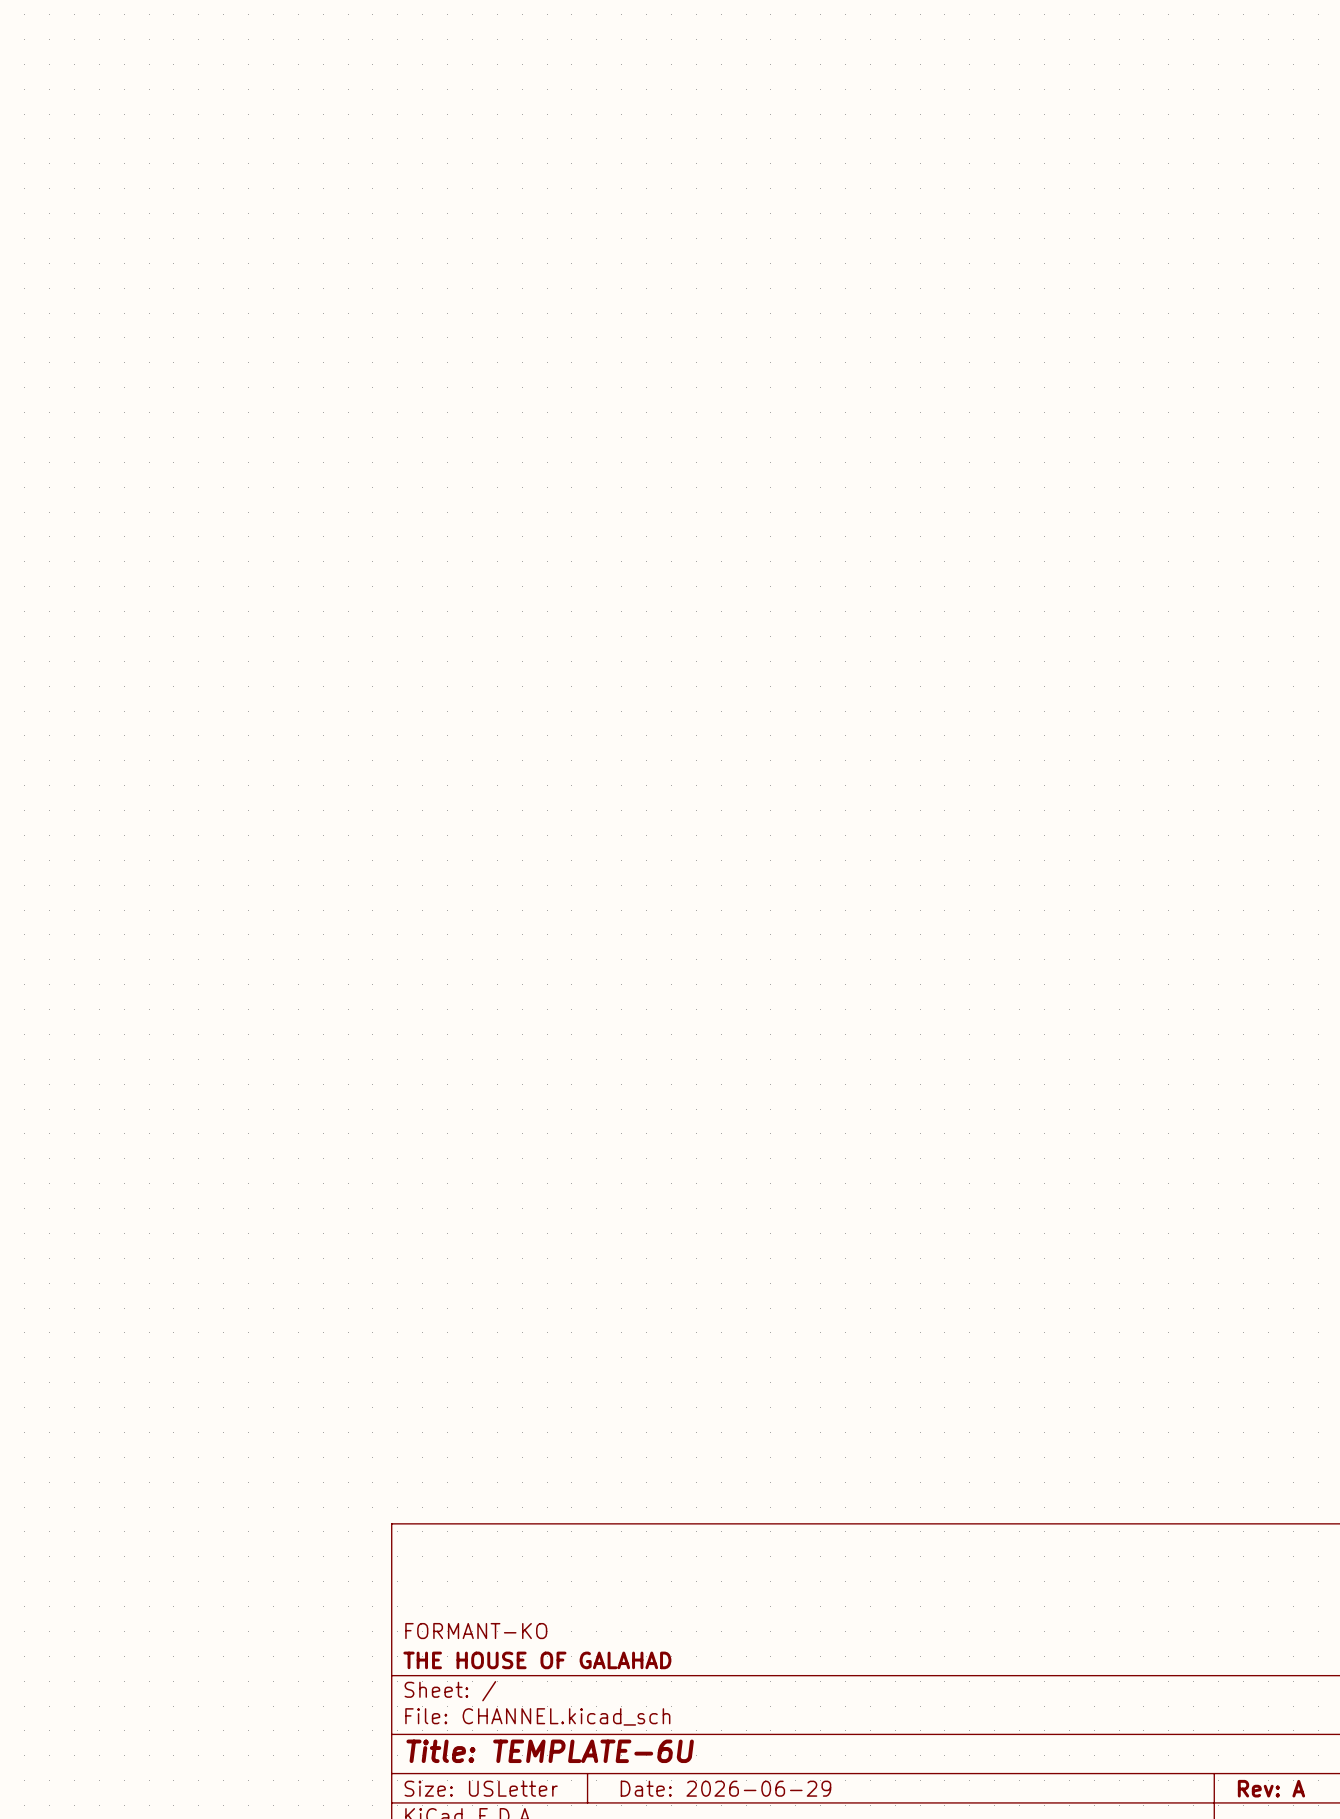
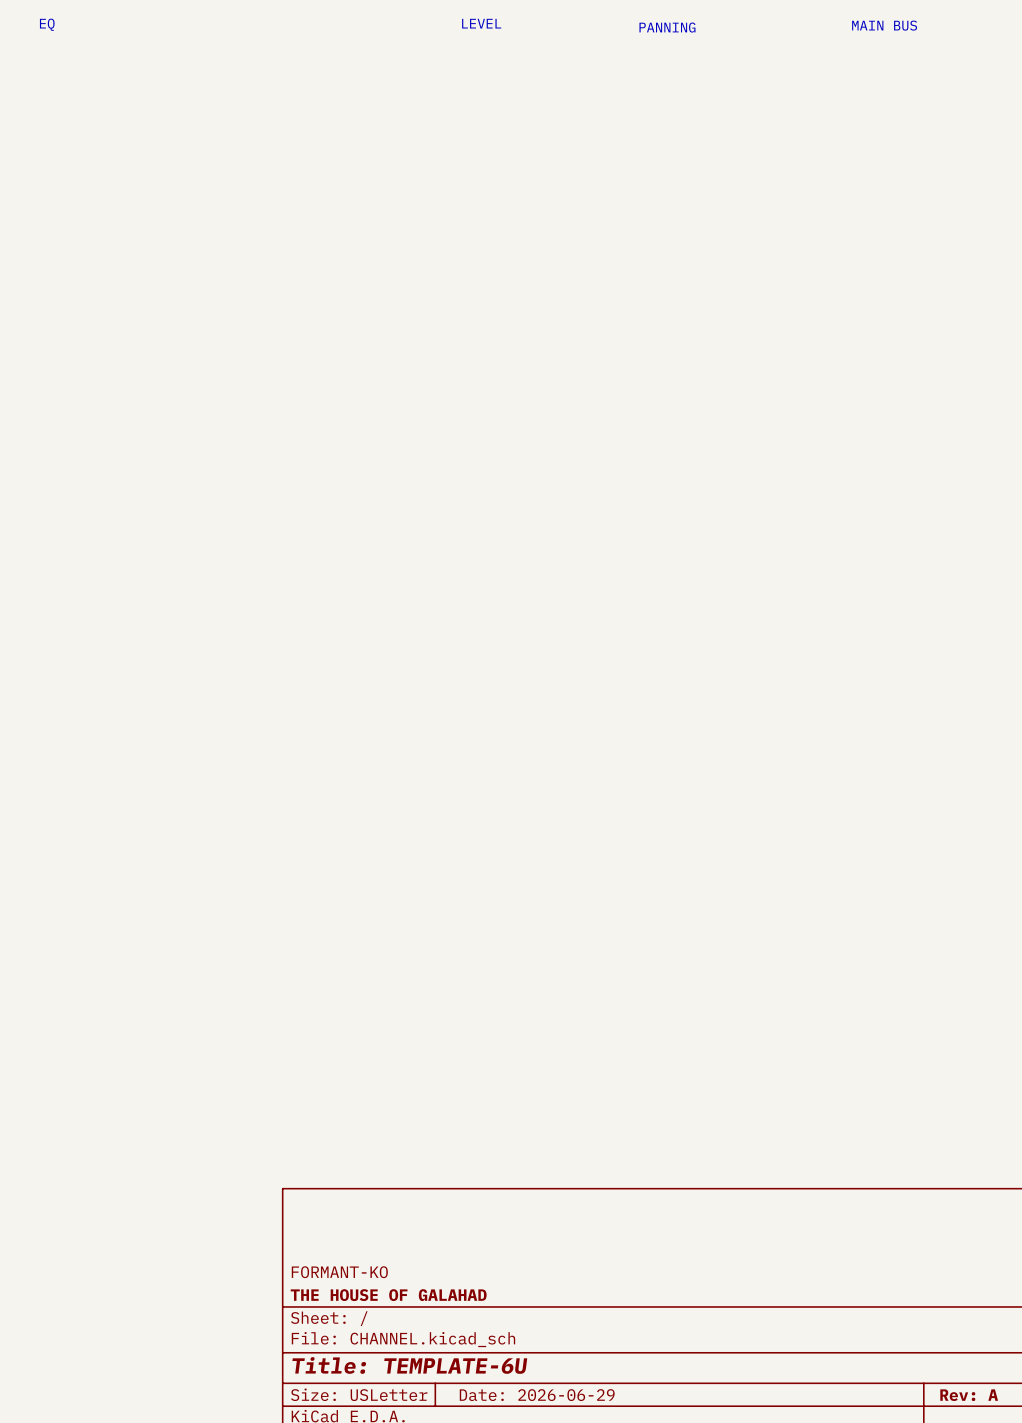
text: none -> EQ (47, 24)
text: none -> LEVEL (481, 23)
text: none -> MAIN BUS (884, 25)
text: none -> PANNING (667, 27)

